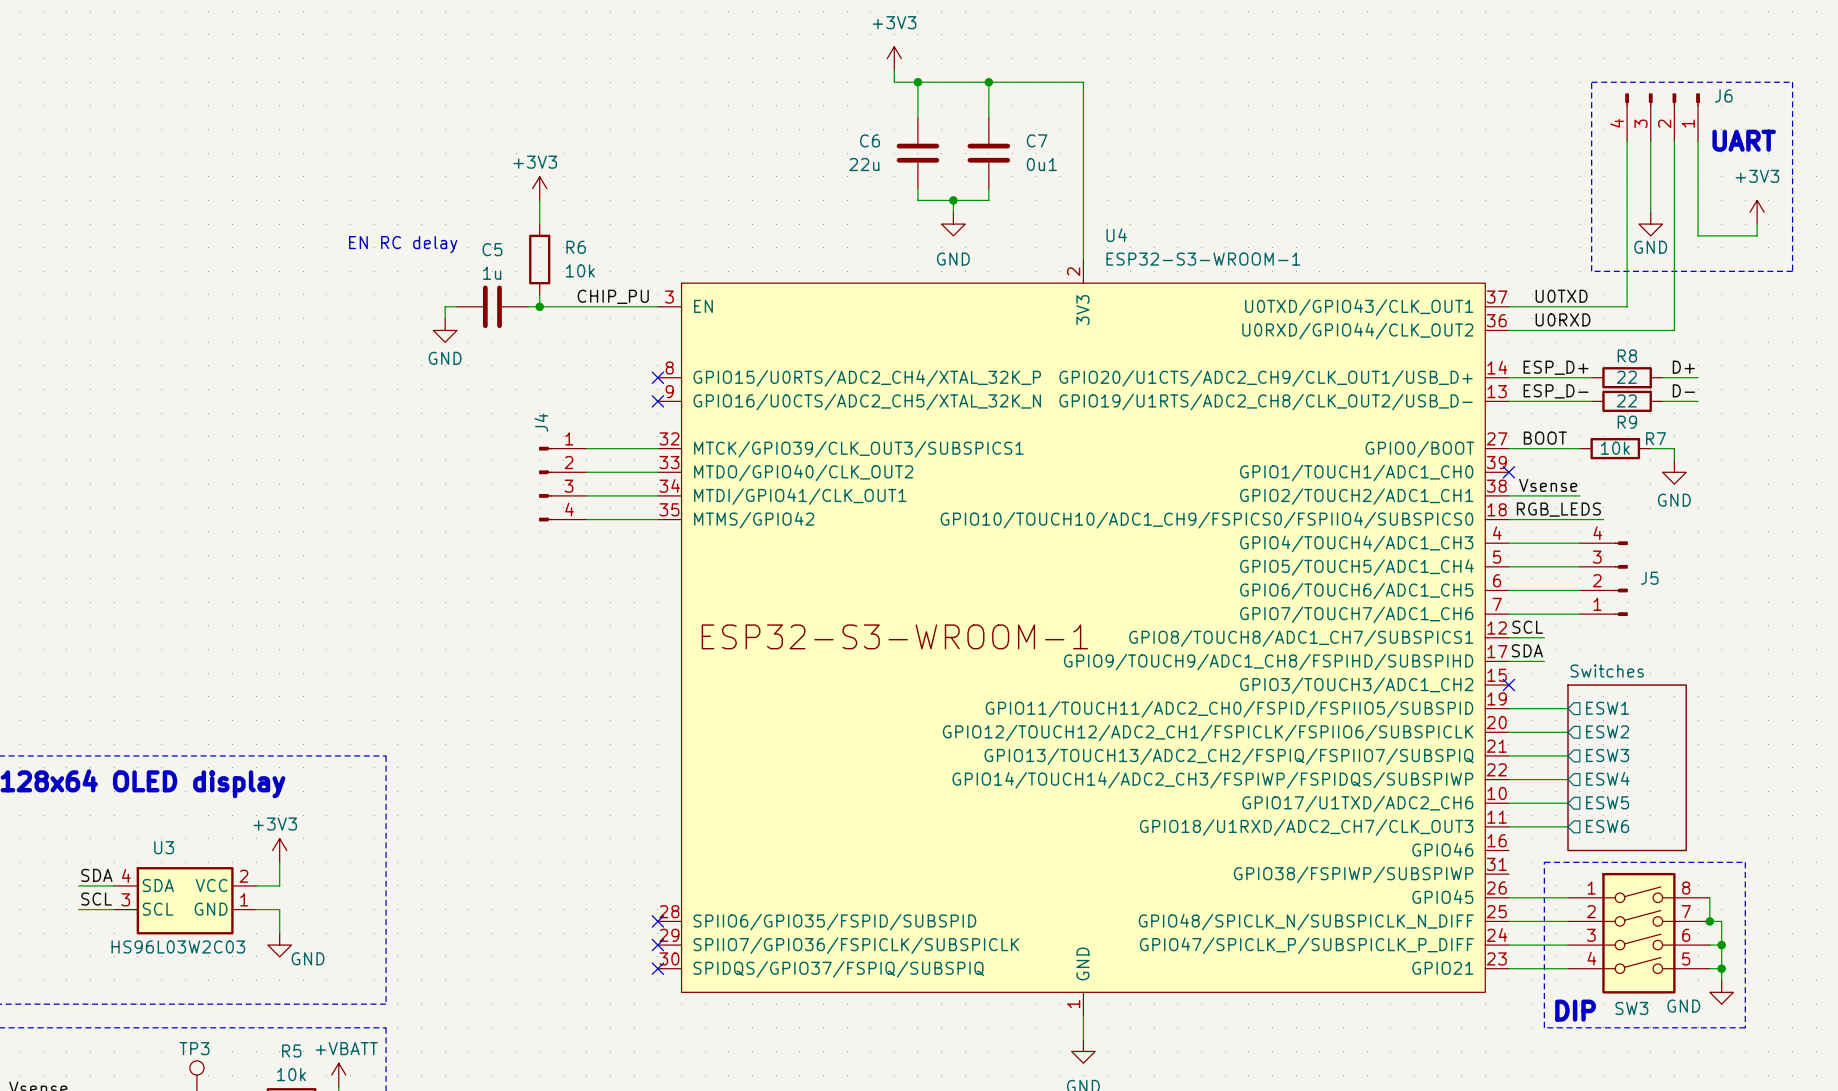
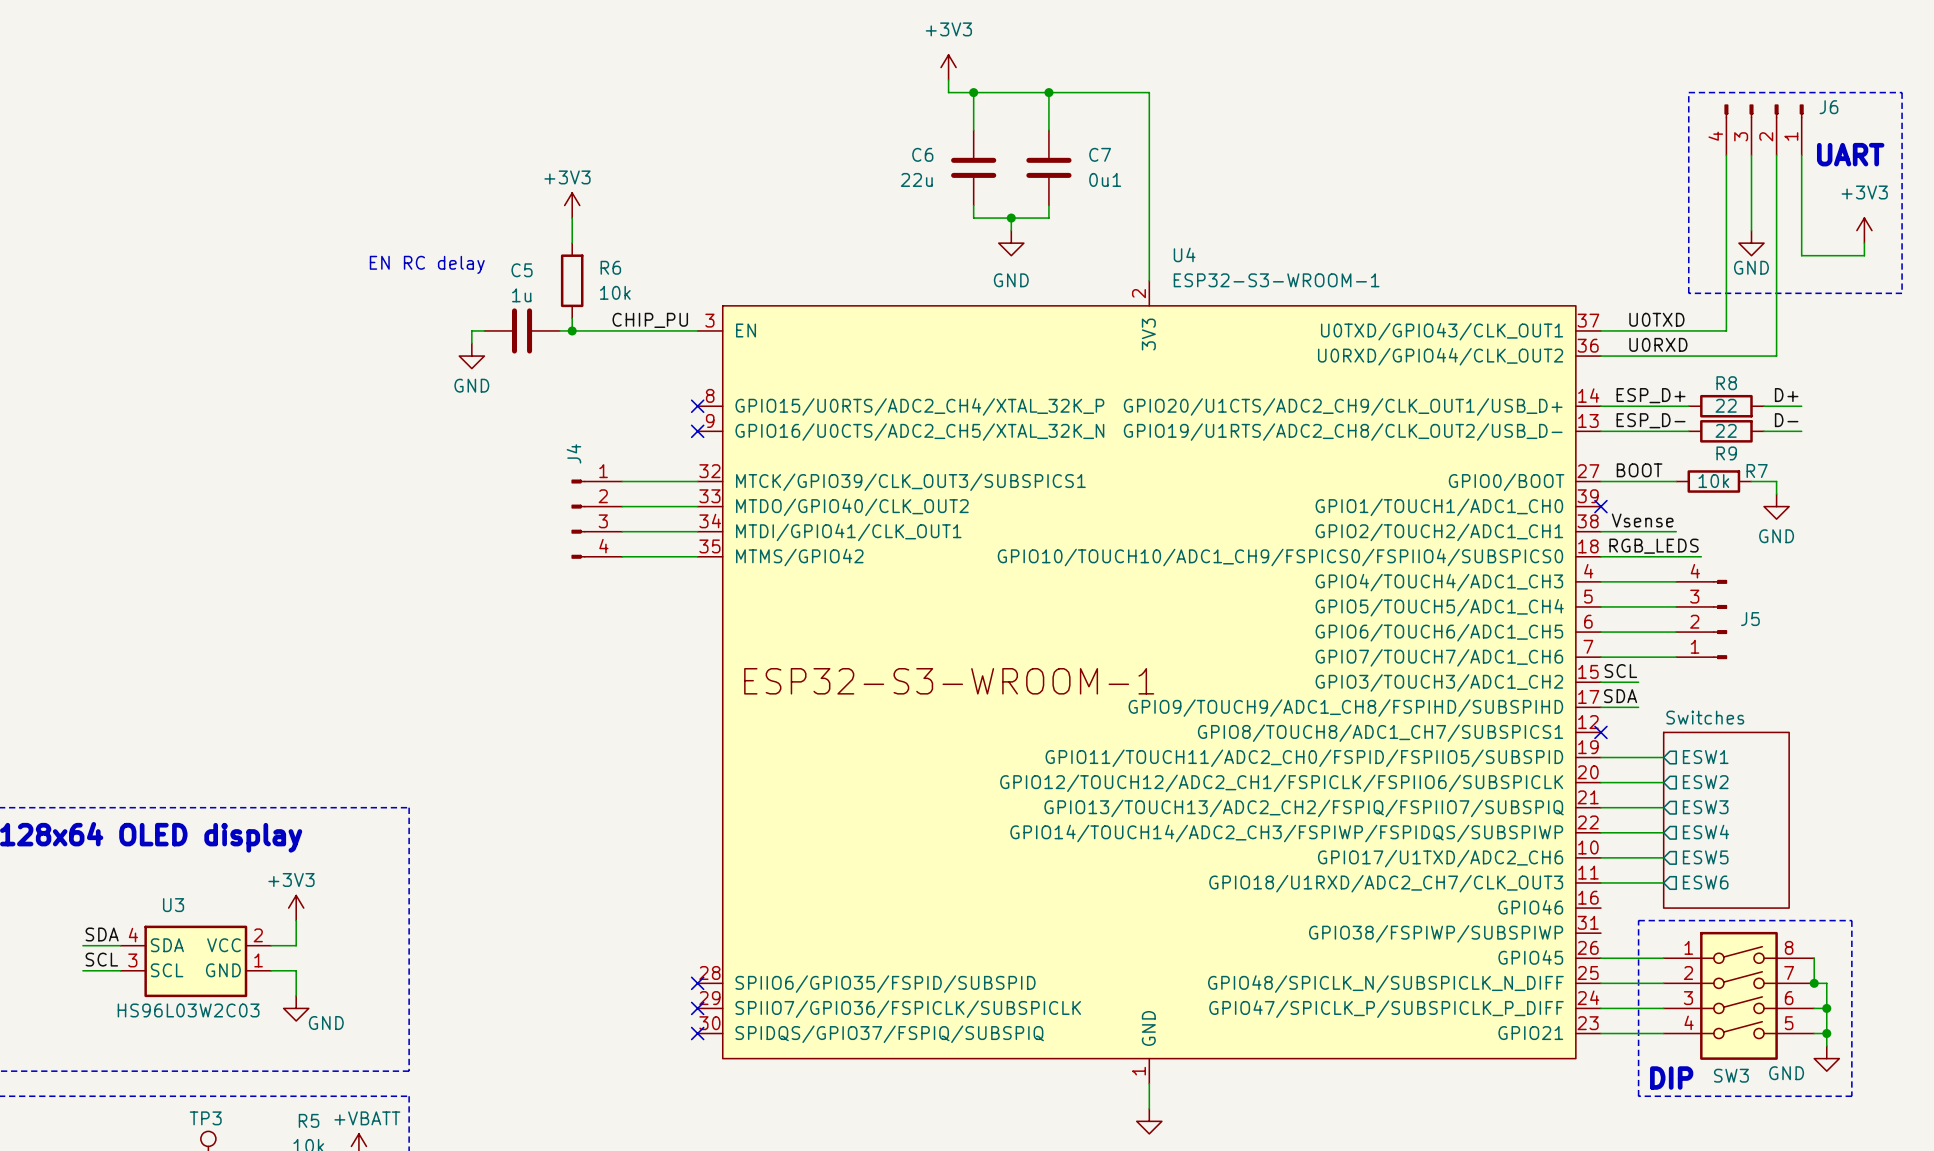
U4 pin number: 12 (1497, 628) -> 15 (1588, 671)
U4 pin name: GPIO8/TOUCH8/ADC1_CH7/SUBSPICS1 (1301, 638) -> GPIO3/TOUCH3/ADC1_CH2 (1439, 682)
U4 pin number: 15 (1497, 675) -> 12 (1588, 722)
U4 pin name: GPIO3/TOUCH3/ADC1_CH2 (1356, 685) -> GPIO8/TOUCH8/ADC1_CH7/SUBSPICS1 (1380, 733)

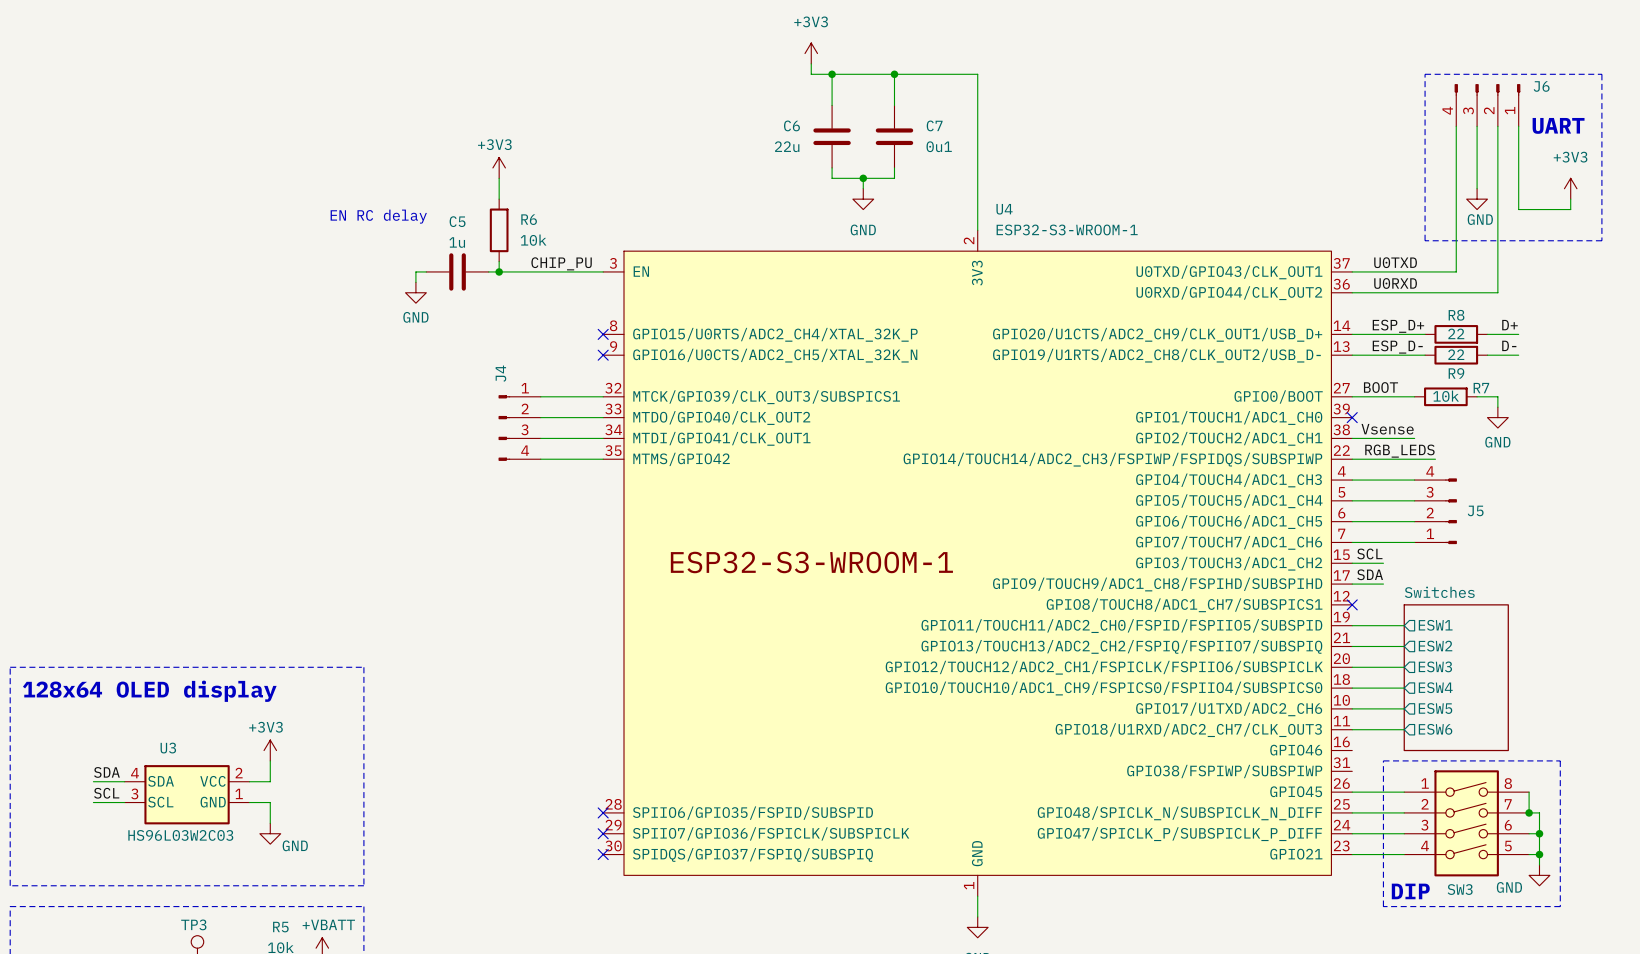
U4 pin number: 18 (1588, 546) -> 22 (1341, 450)
U4 pin name: GPIO10/TOUCH10/ADC1_CH9/FSPICS0/FSPIIO4/SUBSPICS0 (1280, 557) -> GPIO14/TOUCH14/ADC2_CH3/FSPIWP/FSPIDQS/SUBSPIWP (1112, 459)
U4 pin number: 20 (1588, 772) -> 21 (1341, 637)
U4 pin name: GPIO12/TOUCH12/ADC2_CH1/FSPICLK/FSPIIO6/SUBSPICLK (1281, 783) -> GPIO13/TOUCH13/ADC2_CH2/FSPIQ/FSPIIO7/SUBSPIQ (1121, 646)
U4 pin number: 21 (1588, 797) -> 20 (1341, 658)
U4 pin name: GPIO13/TOUCH13/ADC2_CH2/FSPIQ/FSPIIO7/SUBSPIQ (1304, 808) -> GPIO12/TOUCH12/ADC2_CH1/FSPICLK/FSPIIO6/SUBSPICLK (1104, 667)
U4 pin number: 22 (1588, 822) -> 18 (1341, 679)
U4 pin name: GPIO14/TOUCH14/ADC2_CH3/FSPIWP/FSPIDQS/SUBSPIWP (1286, 833) -> GPIO10/TOUCH10/ADC1_CH9/FSPICS0/FSPIIO4/SUBSPICS0 (1104, 688)

